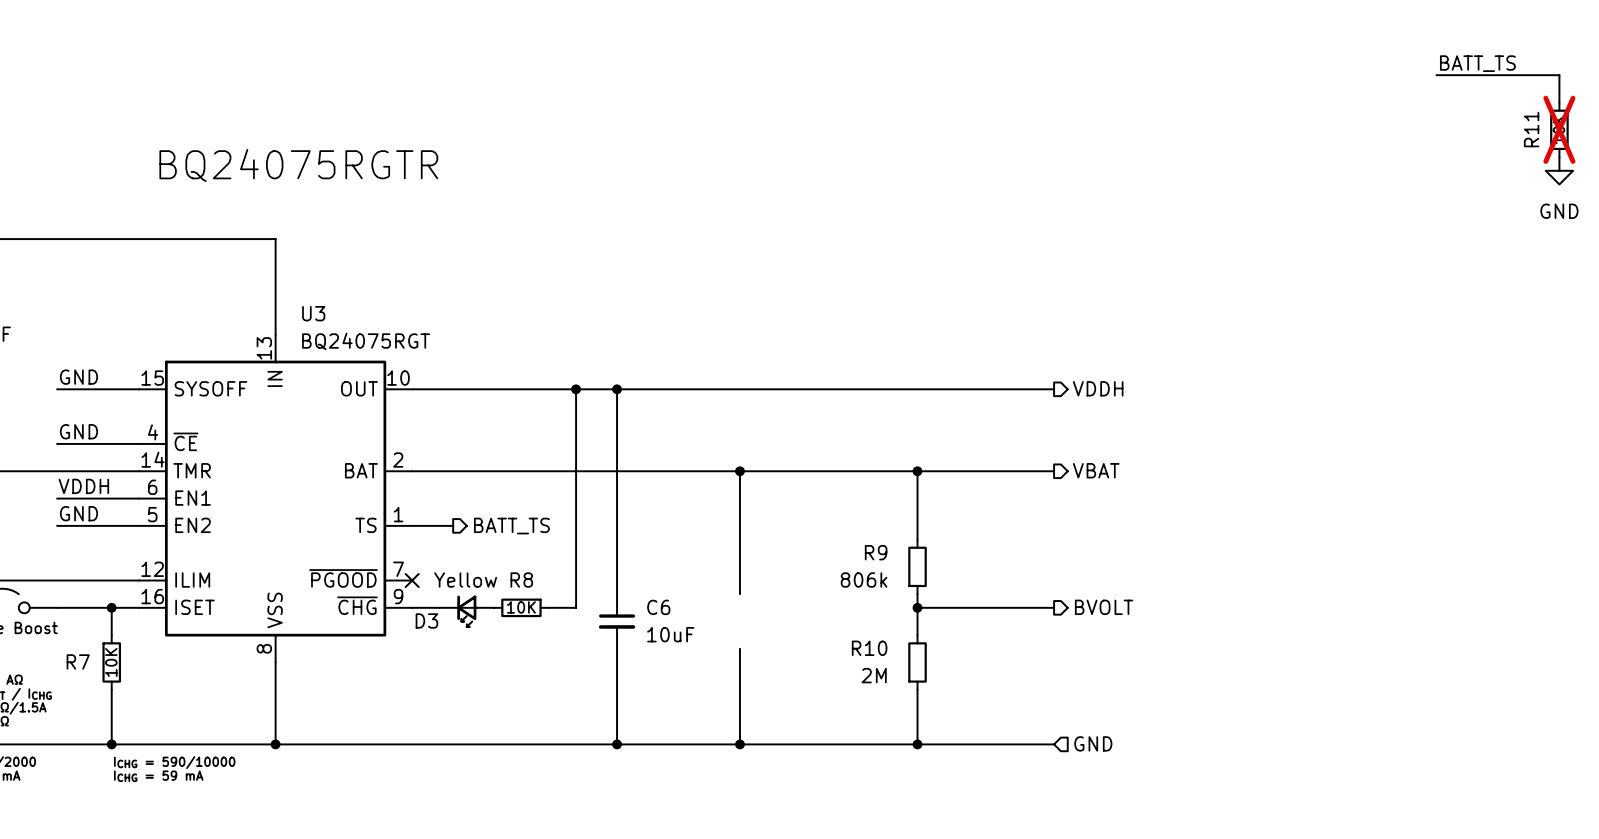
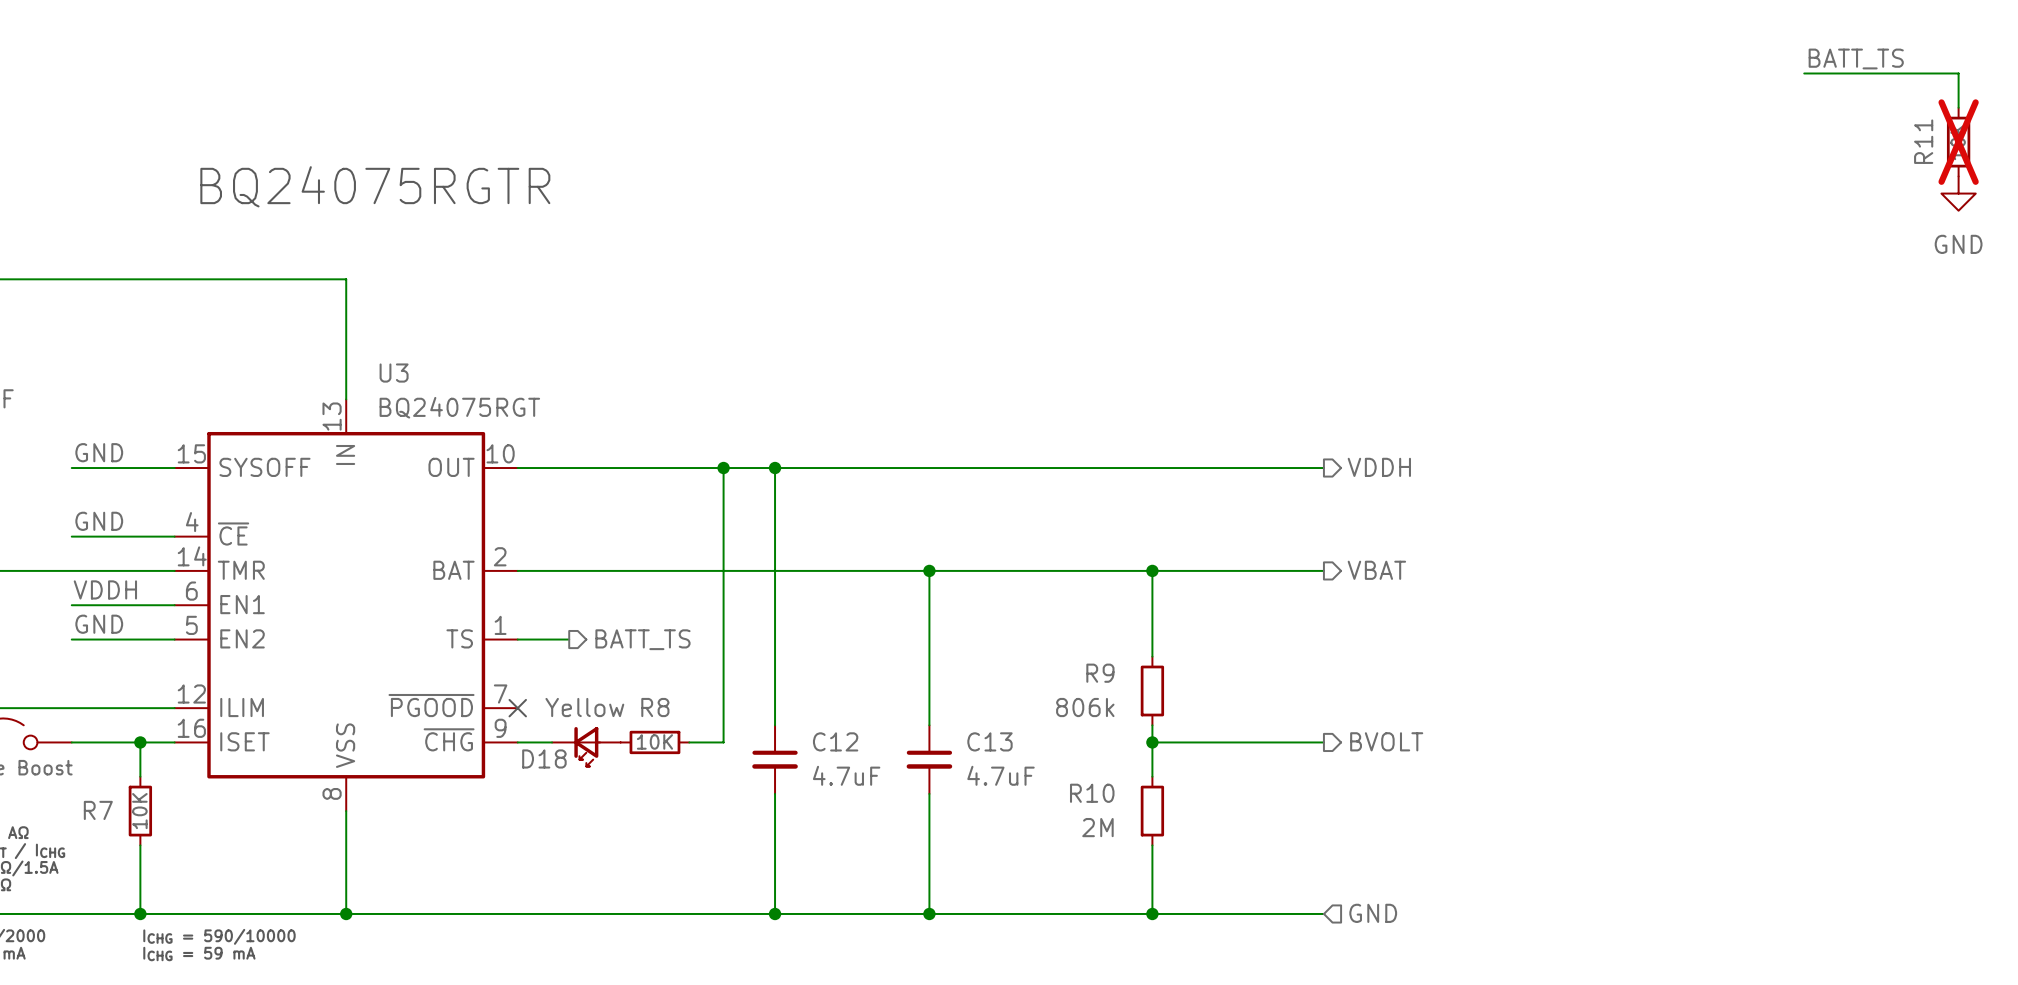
C6 name: C6 (658, 607) -> C12 (835, 741)
D3 name: D3 (426, 620) -> D18 (544, 758)
C13: none -> 4.7uF (929, 759)
C6 value: 10uF (670, 634) -> 4.7uF (846, 775)

